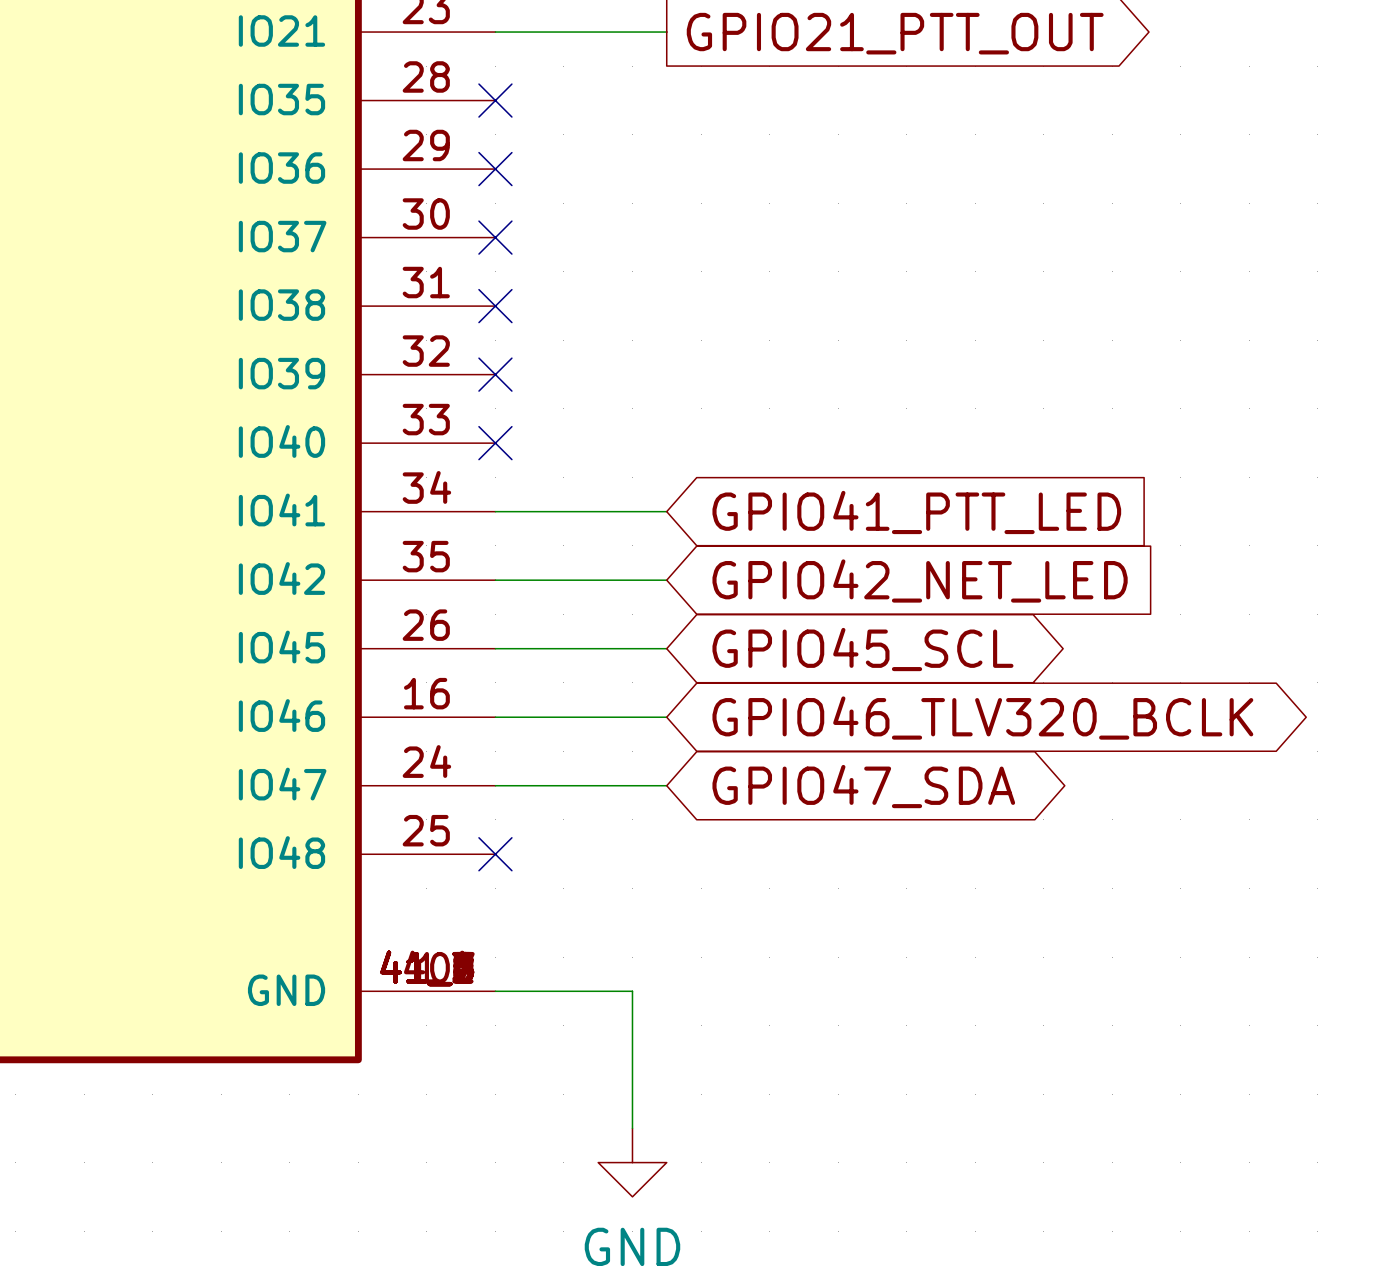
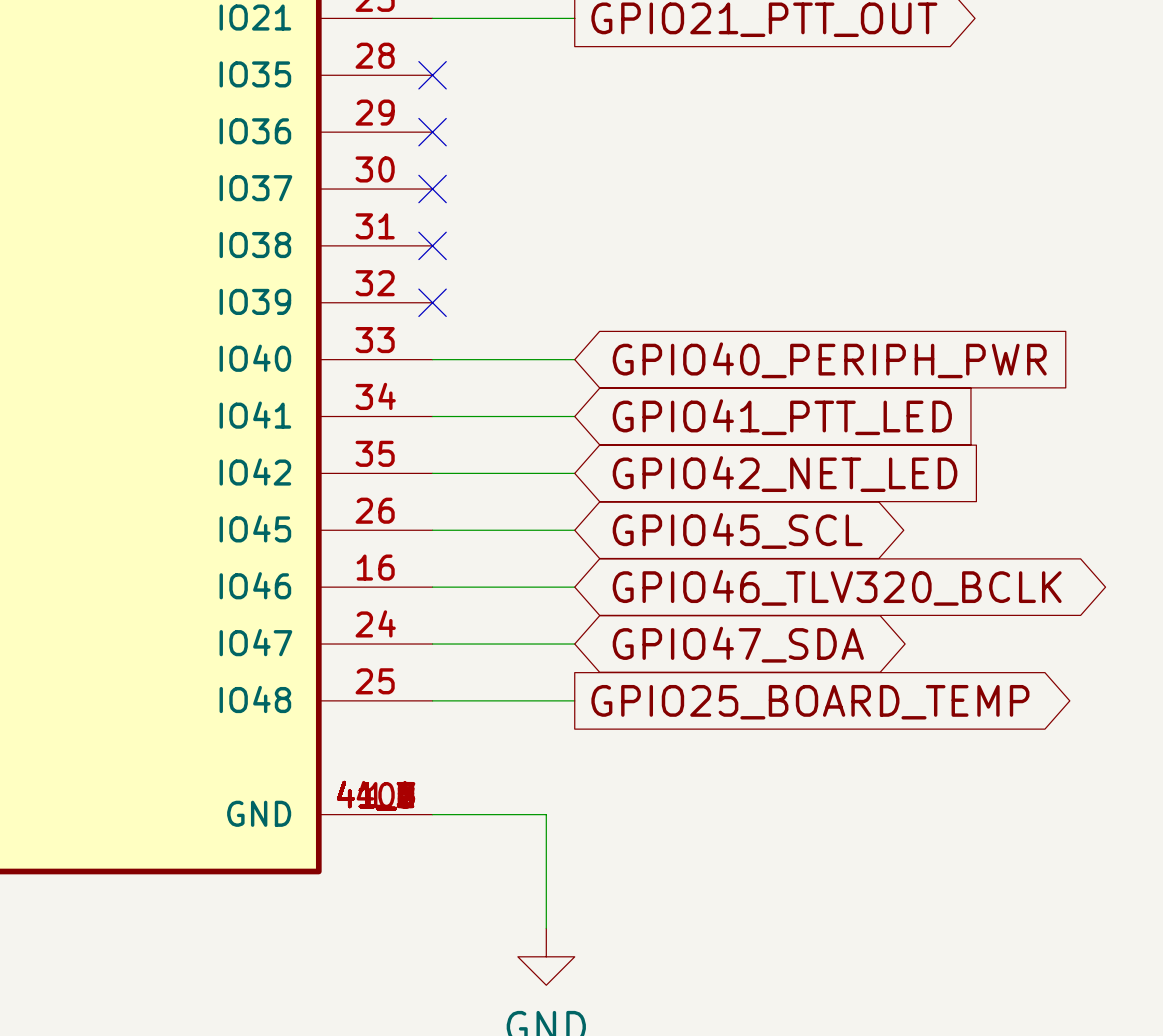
wire: none -> (432, 359) (574, 359)
no-connect mark: (495, 443) -> none
global label: none -> GPIO40_PERIPH_PWR (829, 360)
wire: none -> (432, 700) (574, 700)
no-connect mark: (495, 854) -> none
global label: none -> GPIO25_BOARD_TEMP (810, 702)

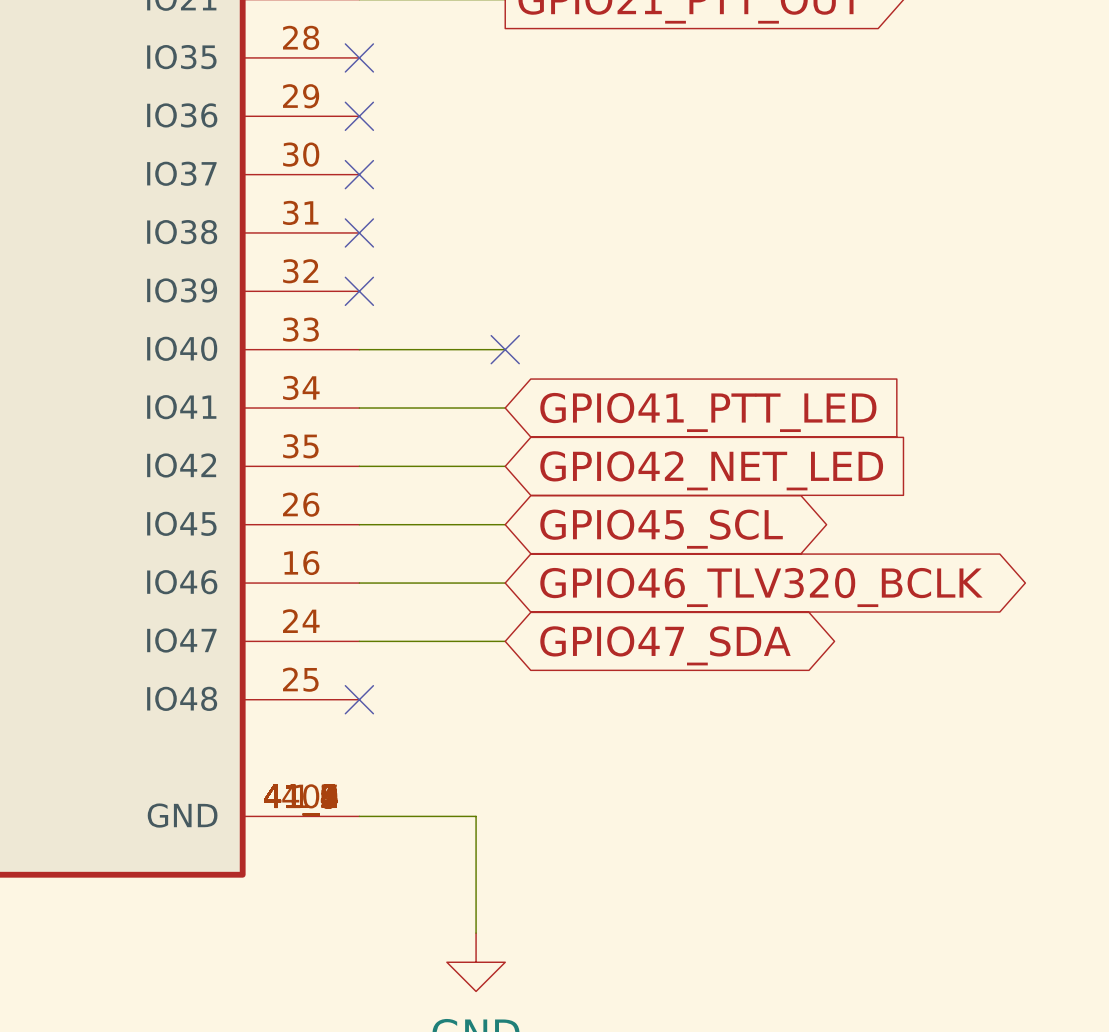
no-connect mark: none -> (505, 349)
global label: GPIO40_PERIPH_PWR (829, 360) -> none
wire: (432, 700) (574, 700) -> none
no-connect mark: none -> (359, 699)
global label: GPIO25_BOARD_TEMP (810, 702) -> none

